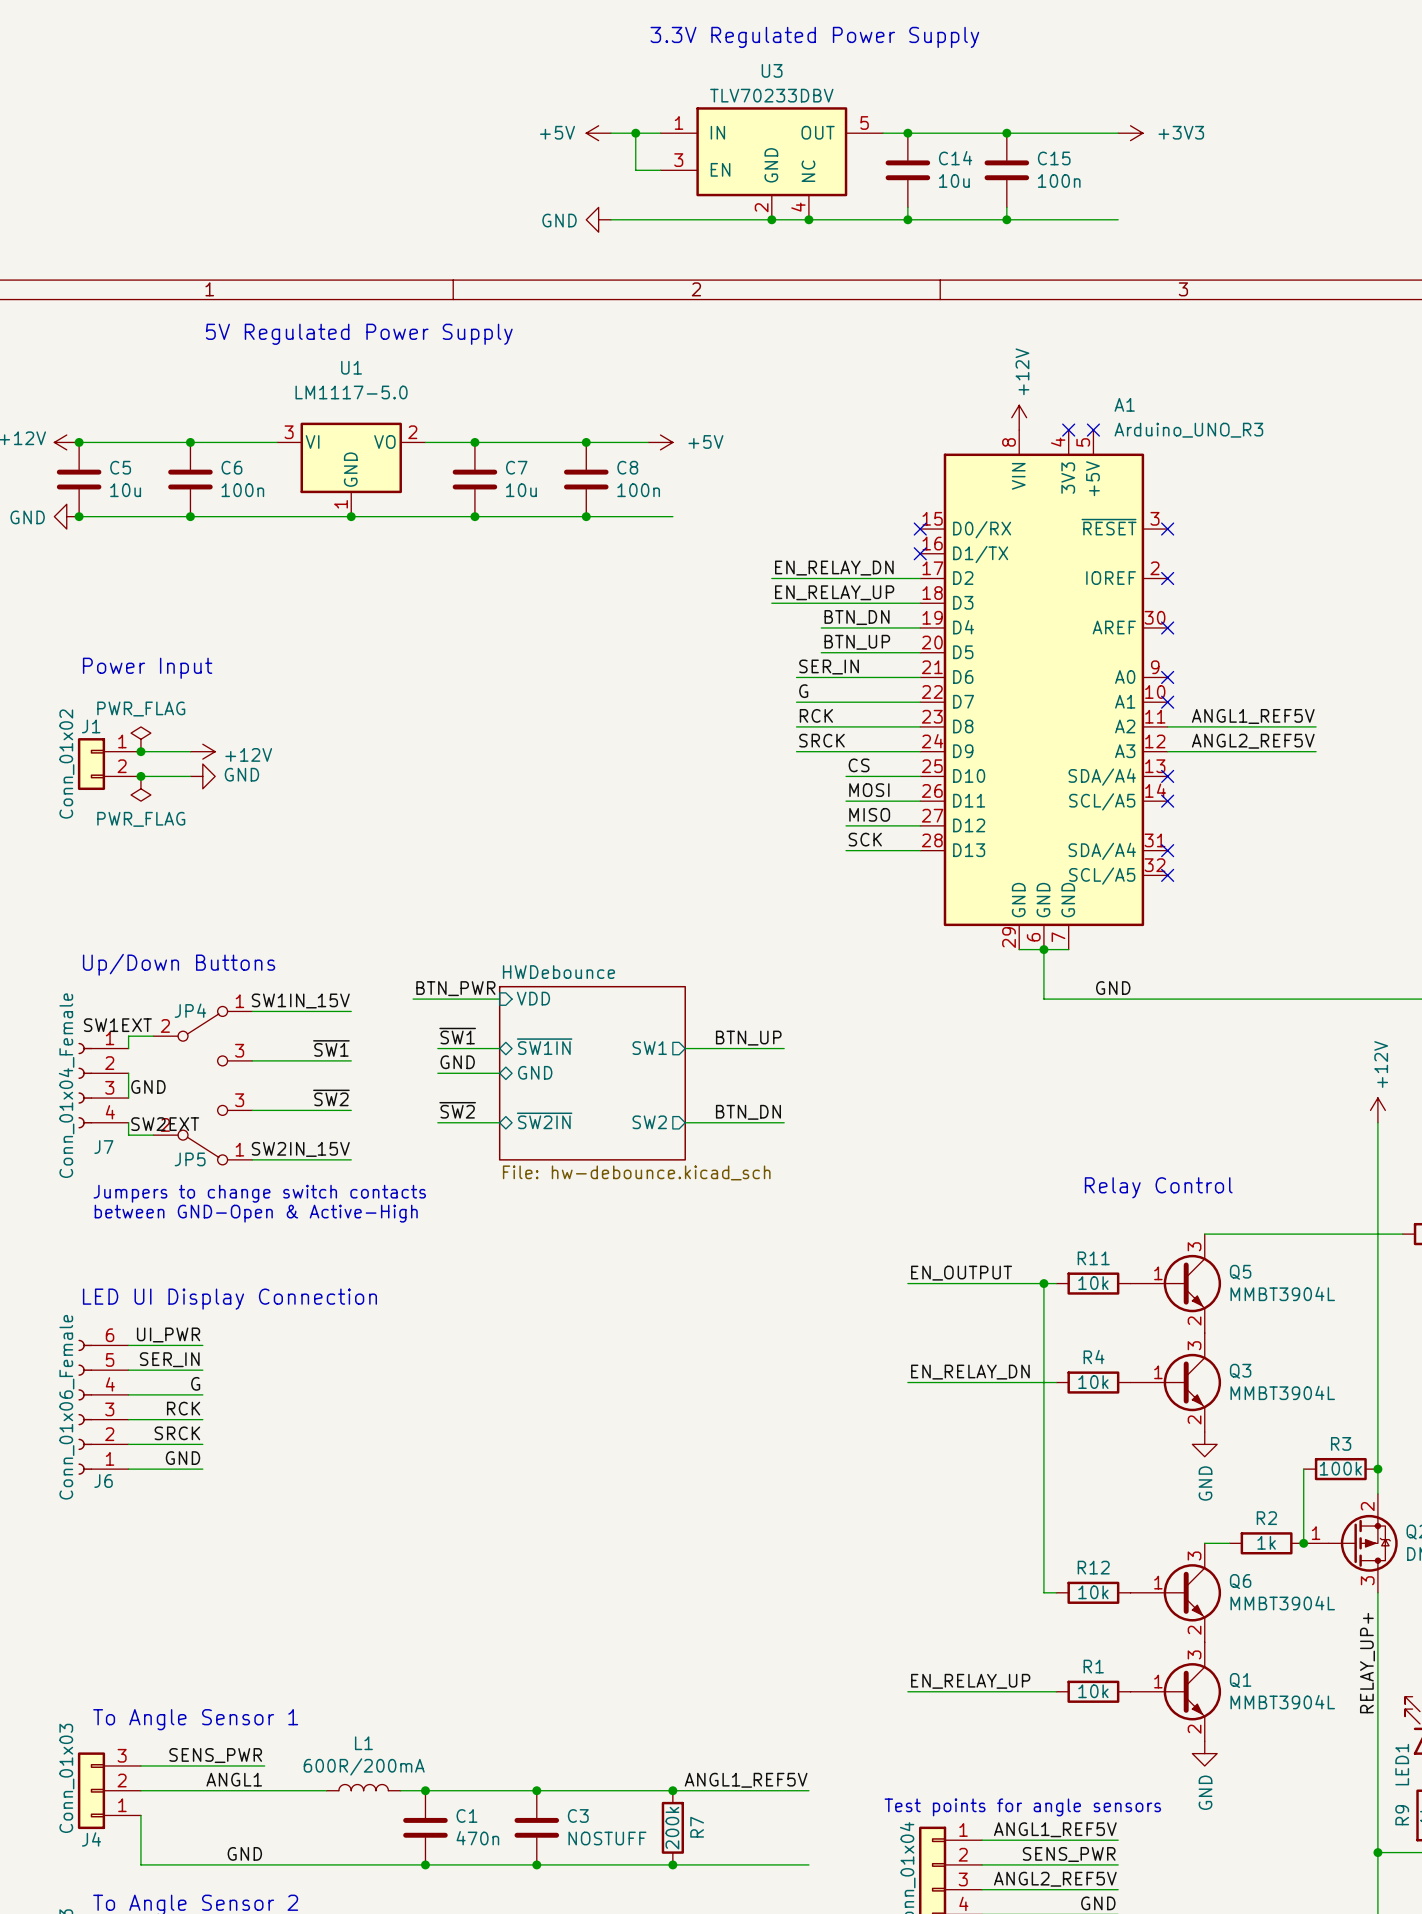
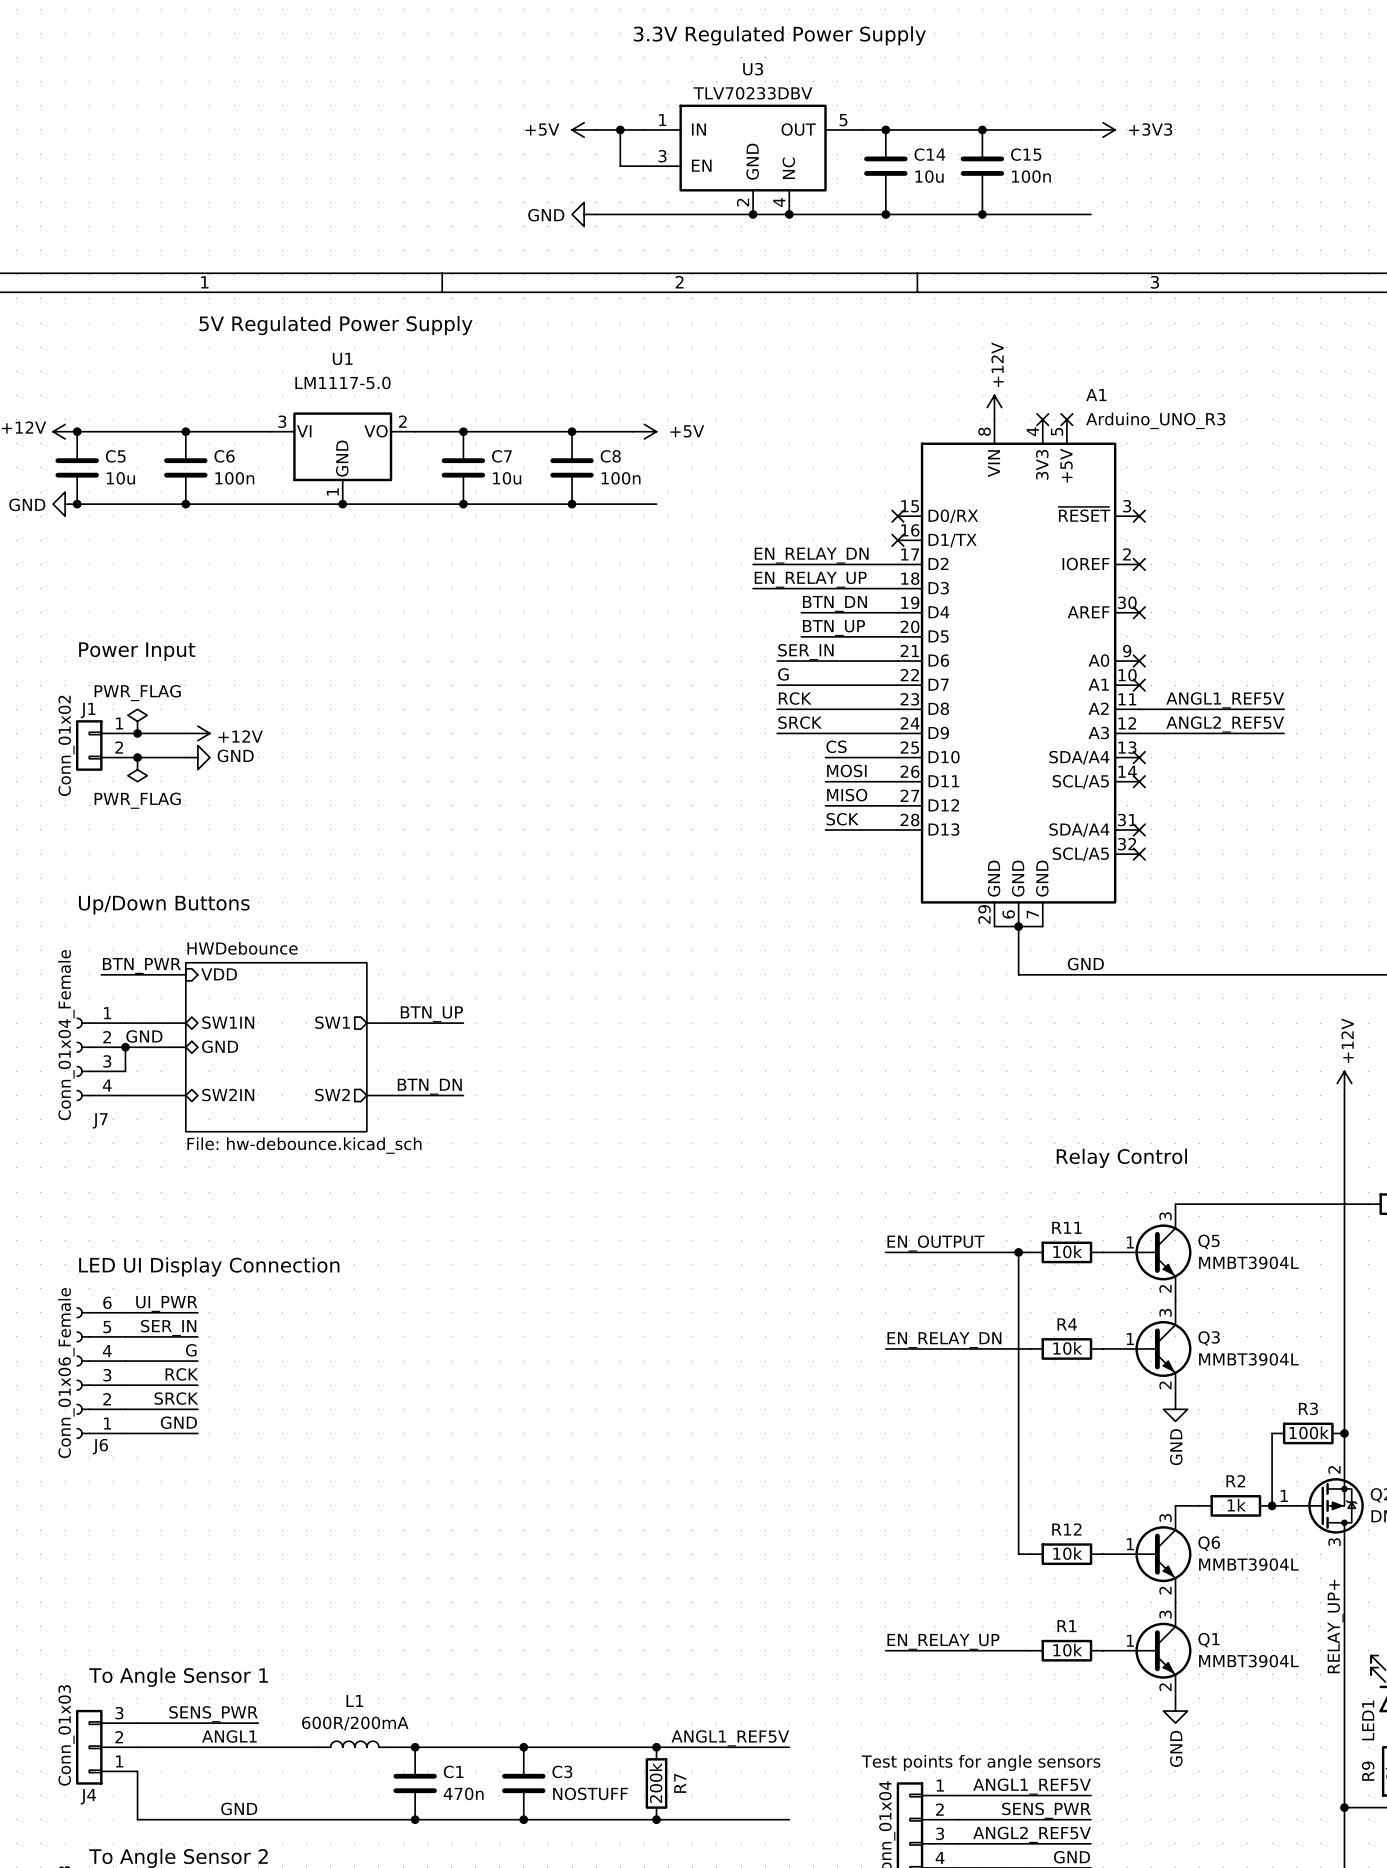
text position: Up/Down Buttons (179, 964) -> Up/Down Buttons (164, 905)
label: none -> BTN_PWR (141, 966)
label: BTN_PWR (455, 988) -> none
sheet pin: none -> VDD (219, 974)
sheet pin: VDD (533, 998) -> none
wire: none -> (101, 974) (185, 974)
wire: (413, 999) (499, 999) -> none
label: SW1IN_15V (300, 1000) -> none
wire: (252, 1011) (351, 1011) -> none
label: SW1EXT (117, 1025) -> none
wire: (153, 1036) (128, 1036) (128, 1048) -> (185, 1023) (125, 1023)
JP4: (202, 1036) -> none
label: ~{SW1} (457, 1036) -> none
label: none -> BTN_UP (431, 1014)
label: BTN_UP (748, 1038) -> none
sheet pin: ~{SW1IN} (544, 1046) -> none
sheet pin: none -> SW1IN (228, 1022)
label: ~{SW1} (331, 1048) -> none
sheet pin: none -> SW1 (332, 1022)
wire: (474, 1048) (499, 1048) -> none
sheet pin: SW1 (649, 1048) -> none
wire: (685, 1048) (784, 1048) -> none
wire: (252, 1060) (351, 1060) -> none
label: GND (457, 1062) -> none
sheet pin: none -> GND (220, 1046)
sheet pin: GND (535, 1072) -> none
wire: none -> (125, 1047) (185, 1047)
junction: none -> (125, 1047)
sheet HWDebounce: none -> File: hw-debounce.kicad_sch (276, 1047)
wire: (437, 1073) (499, 1073) -> (366, 1023) (427, 1023)
sheet HWDebounce: File: hw-debounce.kicad_sch (592, 1073) -> none
J7 value position: Conn_01x04_Female (66, 1085) -> Conn_01x04_Female (66, 1035)
label position: GND (148, 1086) -> GND (144, 1036)
label: ~{SW2} (331, 1097) -> none
wire: (252, 1110) (351, 1110) -> none
label: ~{SW2} (457, 1110) -> none
label: none -> BTN_DN (429, 1086)
label: BTN_DN (748, 1112) -> none
sheet pin: ~{SW2IN} (544, 1120) -> none
wire: (128, 1122) (128, 1135) (153, 1135) -> (125, 1095) (185, 1095)
sheet pin: none -> SW2IN (228, 1095)
sheet pin: none -> SW2 (332, 1095)
wire: none -> (366, 1095) (427, 1095)
wire: (474, 1122) (499, 1122) -> none
sheet pin: SW2 (649, 1122) -> none
wire: (685, 1122) (784, 1122) -> none
label: SW2EXT (165, 1124) -> none
JP5: (202, 1135) -> none
label: SW2IN_15V (300, 1149) -> none
text: Jumpers to change switch contacts (259, 1193) -> none
text: between GND-Open & Active-High (256, 1213) -> none

